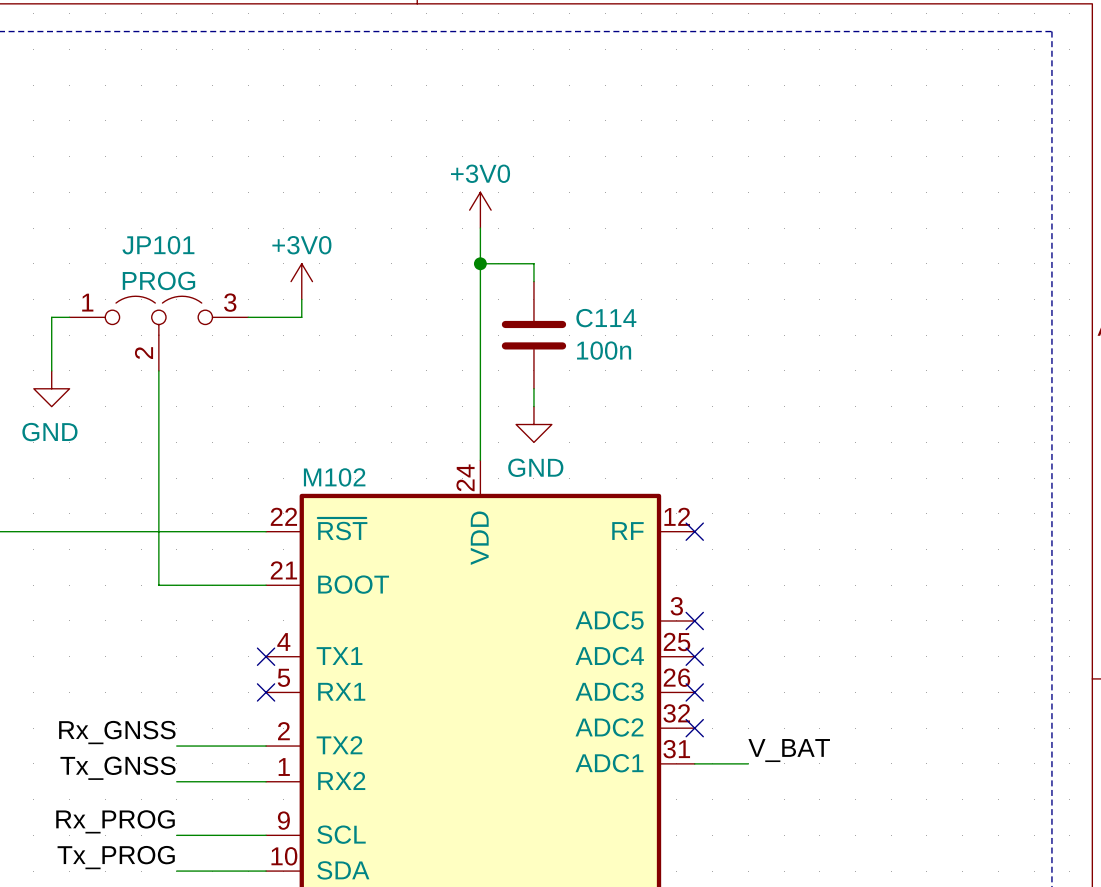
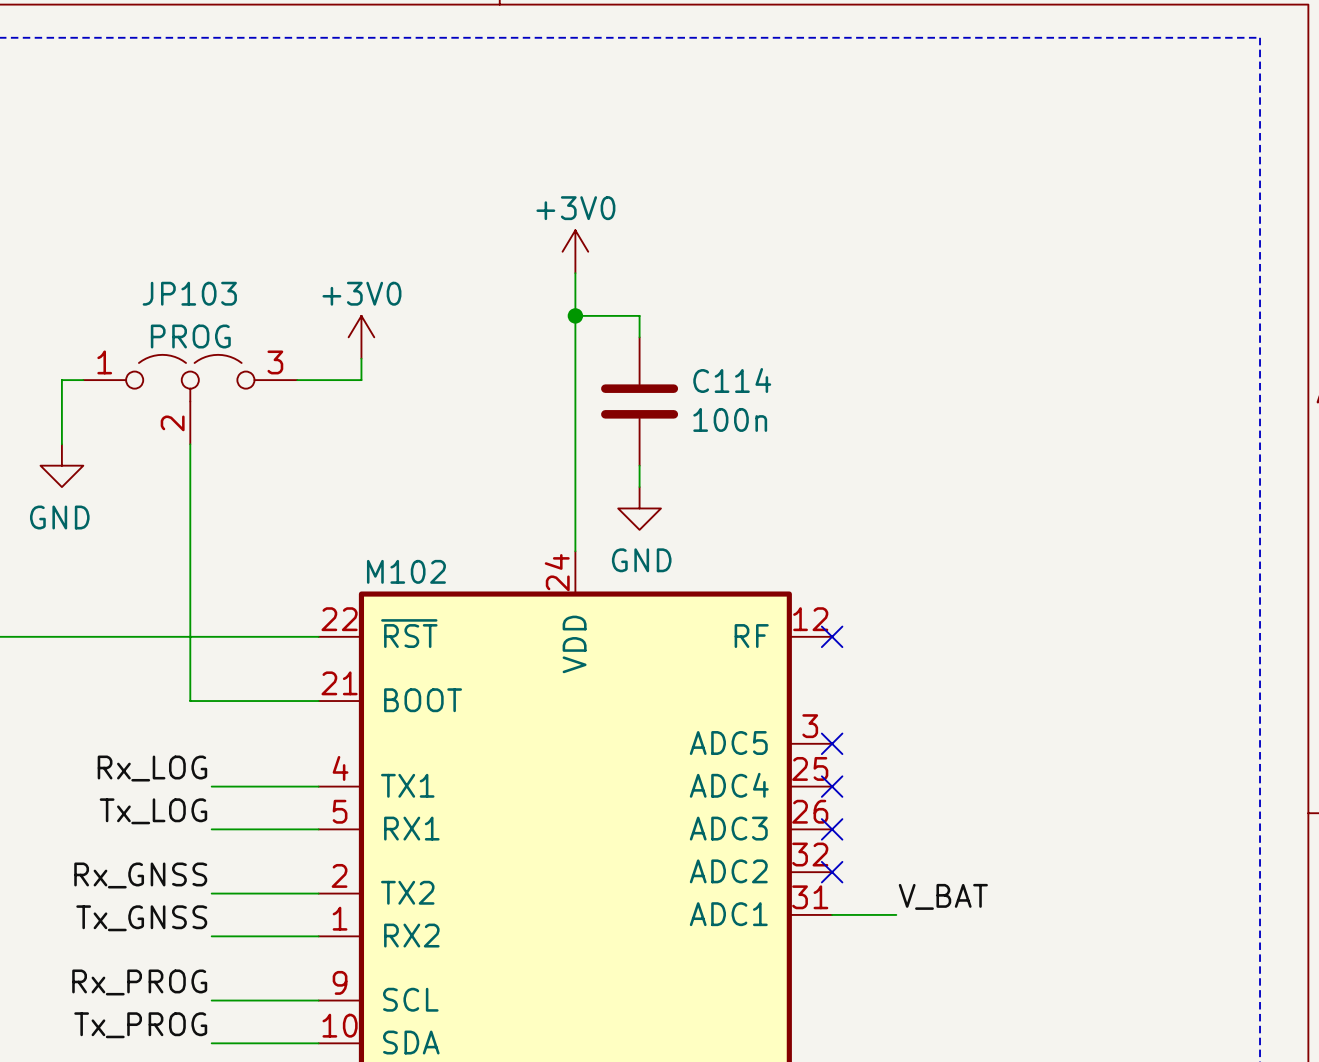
JP101 name: JP101 (158, 245) -> JP103 (189, 293)
label: none -> Rx_LOG (152, 768)
wire: none -> (211, 786) (318, 786)
no-connect mark: (266, 656) -> none
label: none -> Tx_LOG (153, 811)
wire: none -> (211, 829) (318, 829)
no-connect mark: (266, 692) -> none

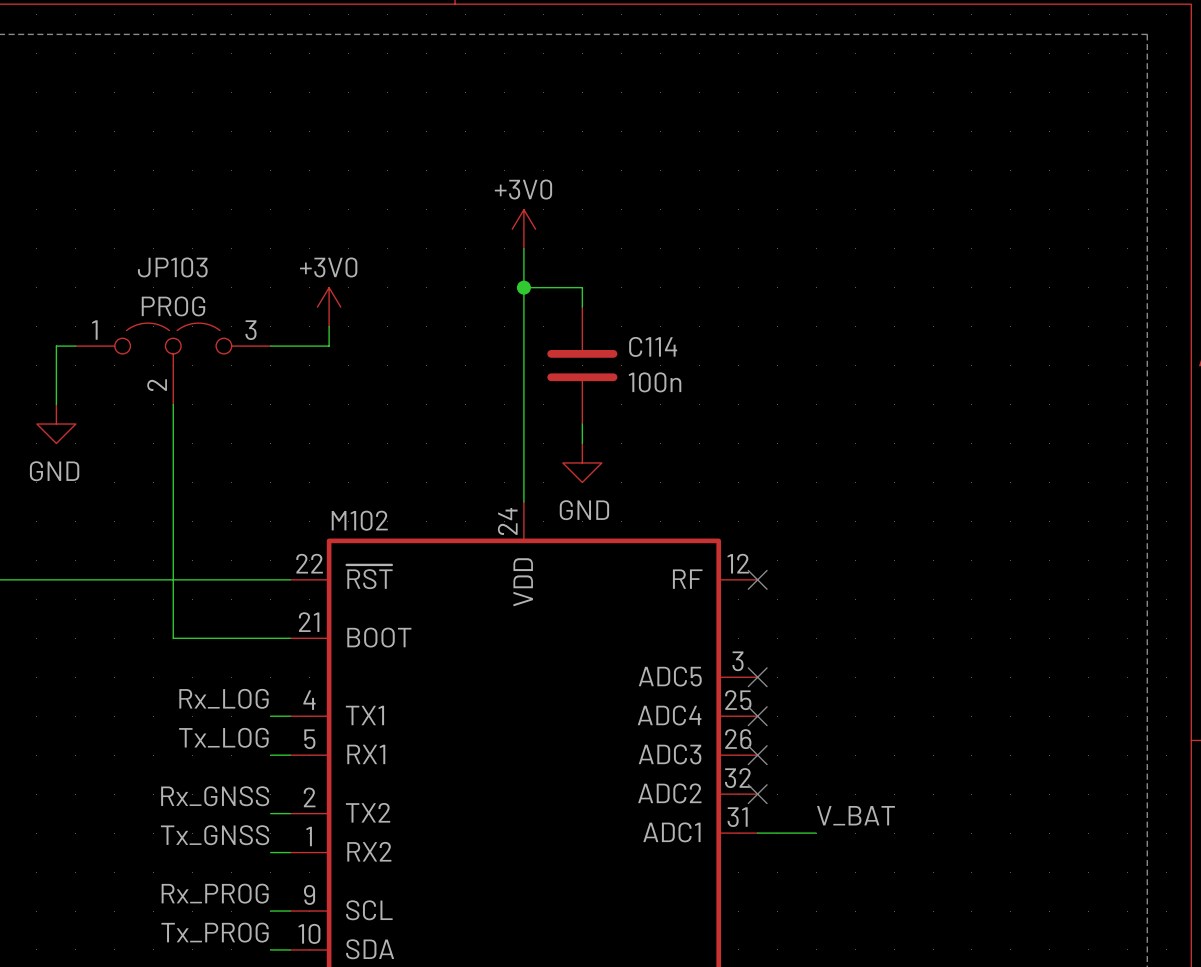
label position: Rx_LOG (152, 768) -> Rx_LOG (224, 698)
wire: (211, 786) (297, 786) -> none
label position: Tx_LOG (153, 811) -> Tx_LOG (223, 737)
wire: (211, 829) (297, 829) -> none
label position: Rx_GNSS (140, 875) -> Rx_GNSS (215, 796)
wire: (211, 893) (297, 893) -> none
label position: Tx_GNSS (141, 918) -> Tx_GNSS (215, 835)
wire: (211, 936) (297, 936) -> none
label position: Rx_PROG (139, 982) -> Rx_PROG (215, 893)
wire: (211, 1000) (297, 1000) -> none
label position: Tx_PROG (140, 1025) -> Tx_PROG (215, 932)
wire: (211, 1043) (297, 1043) -> none

